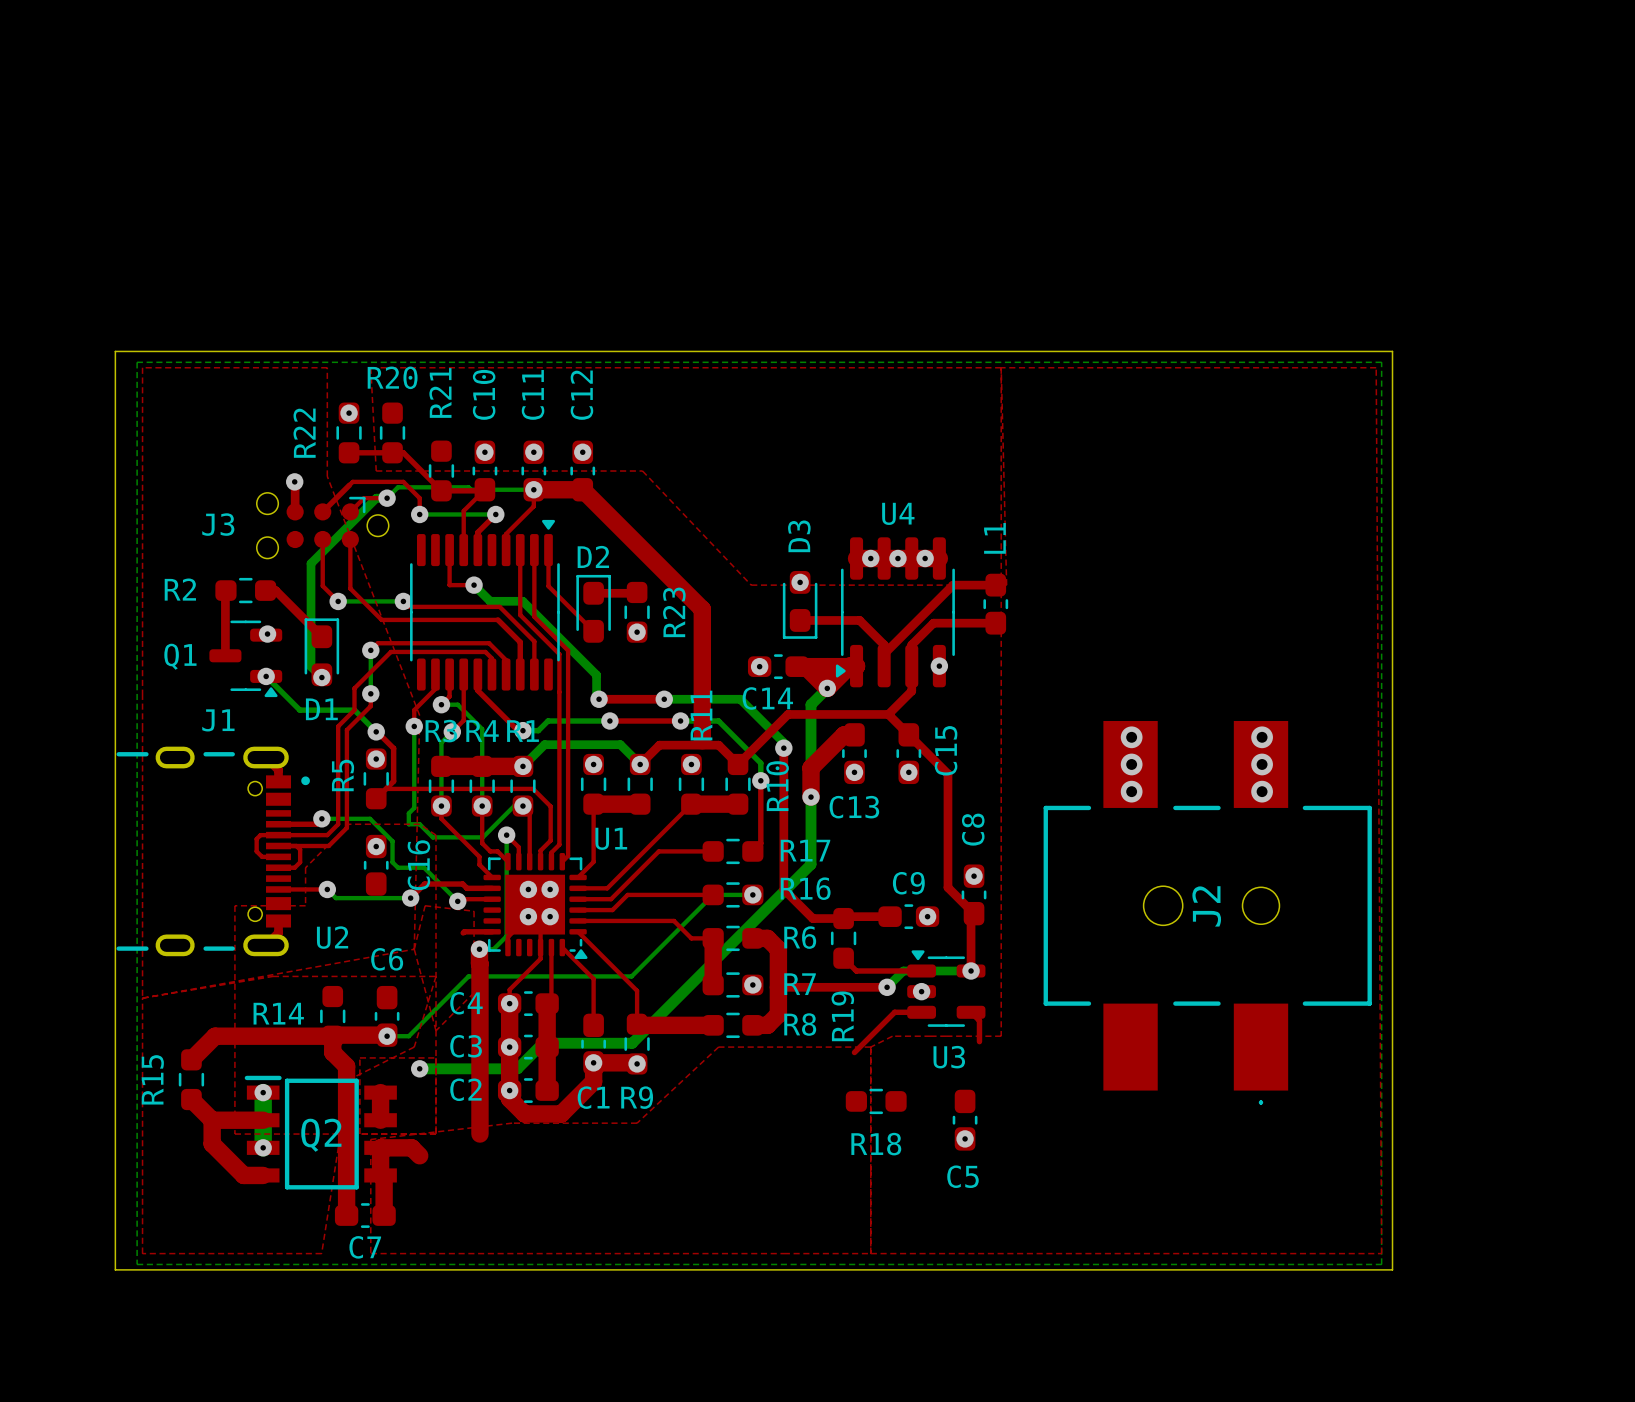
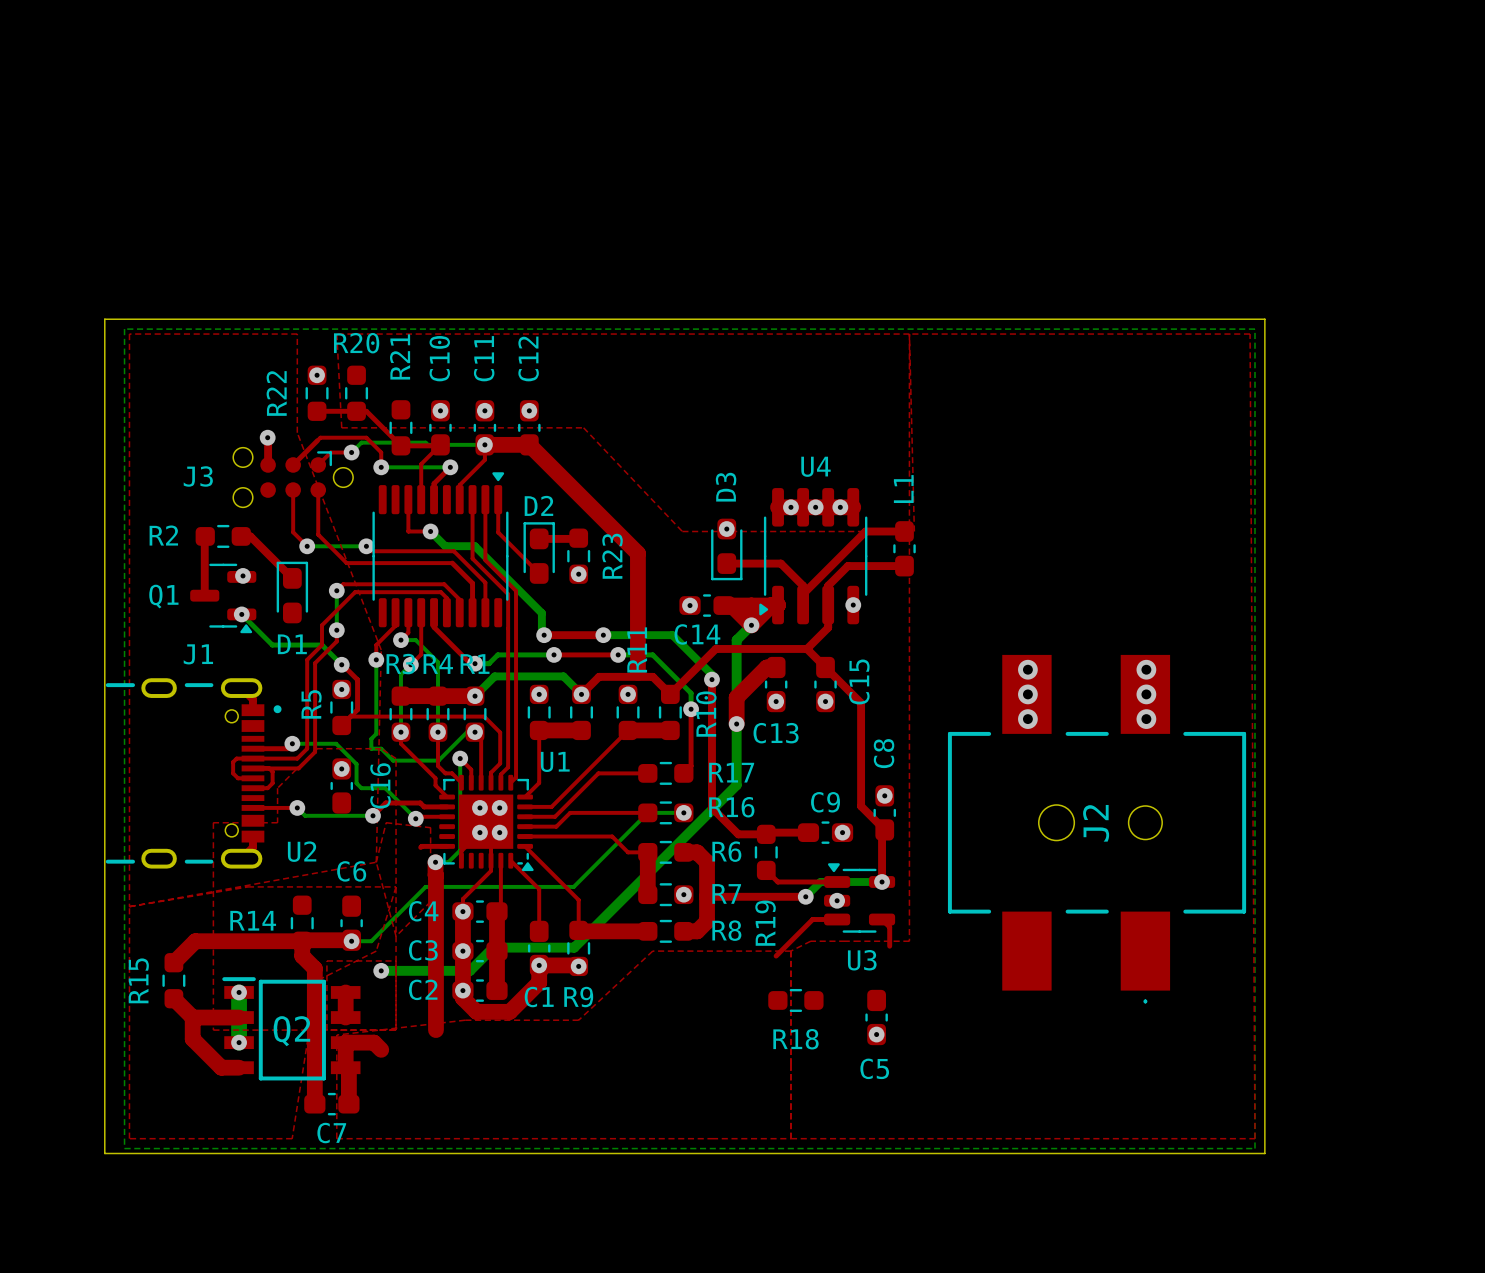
bottom track: (387, 498) (376, 498) (311, 563) (311, 666) (321, 677) -> none
via: (321, 677) -> none

